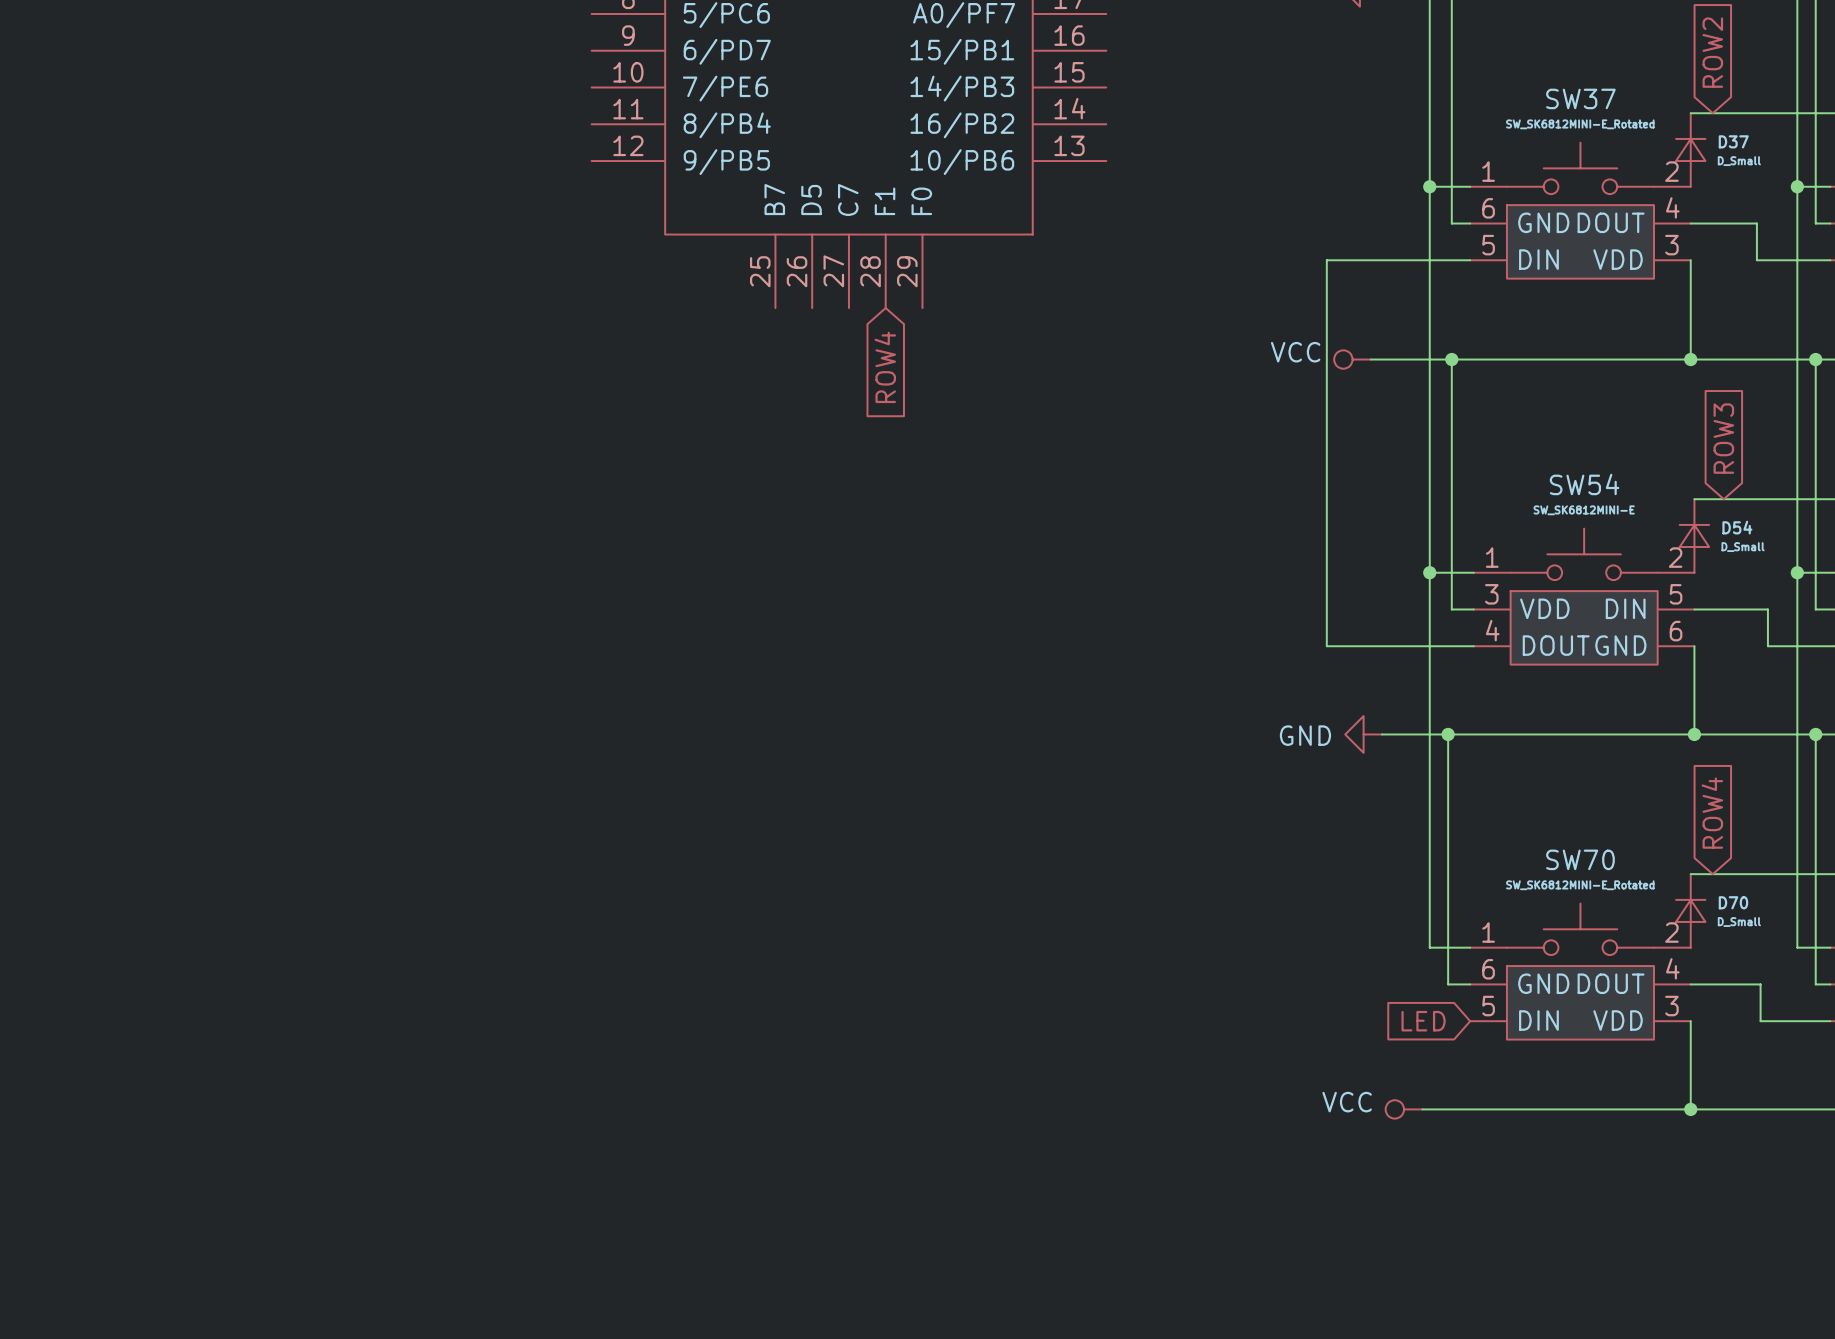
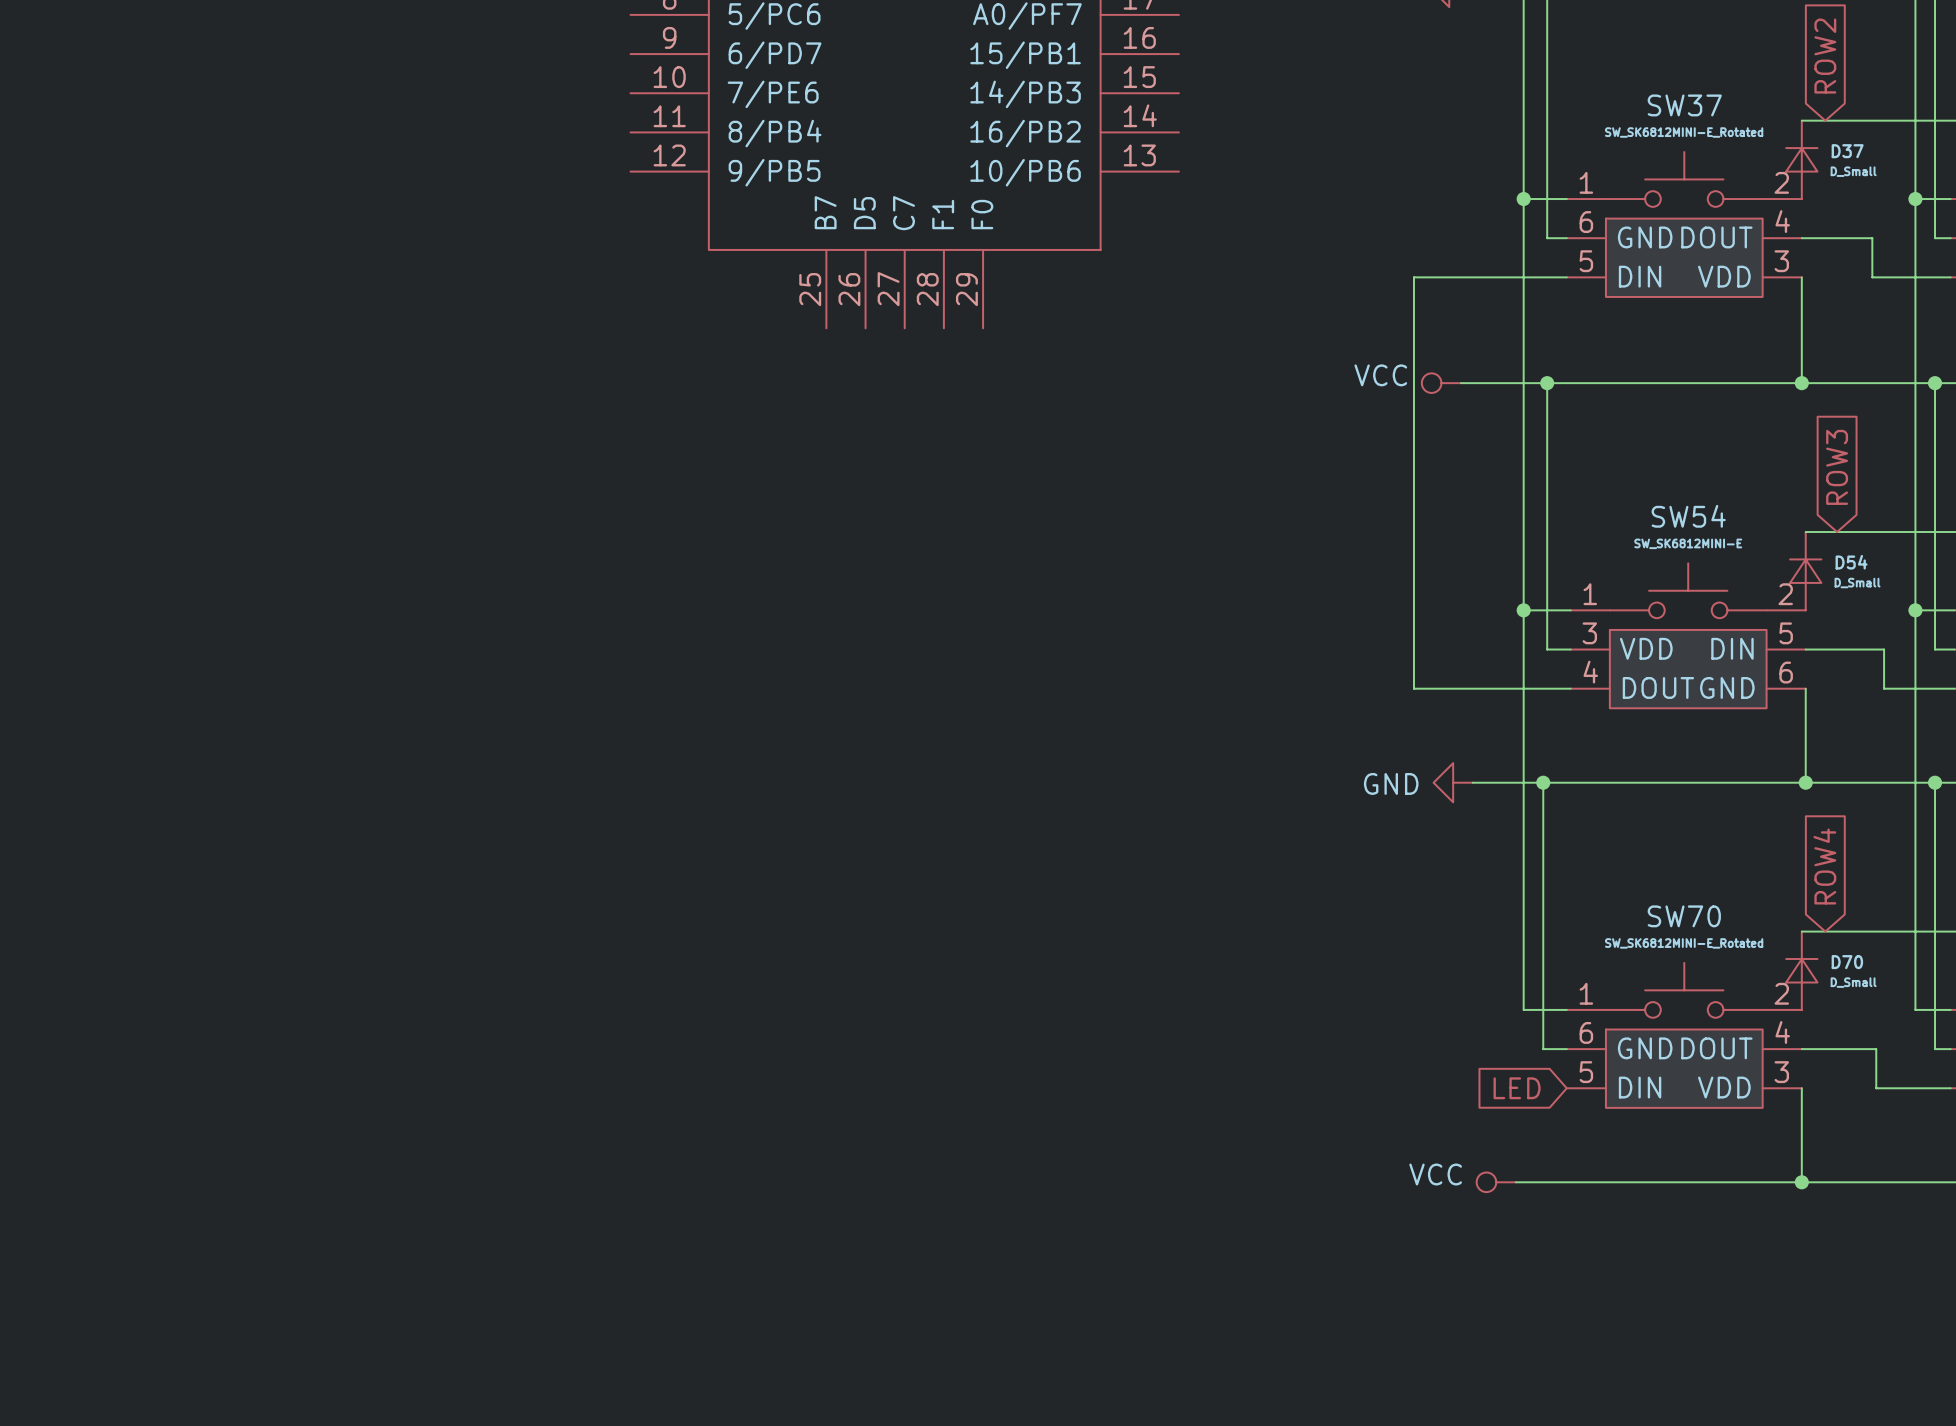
global label: ROW4 (885, 367) -> none

